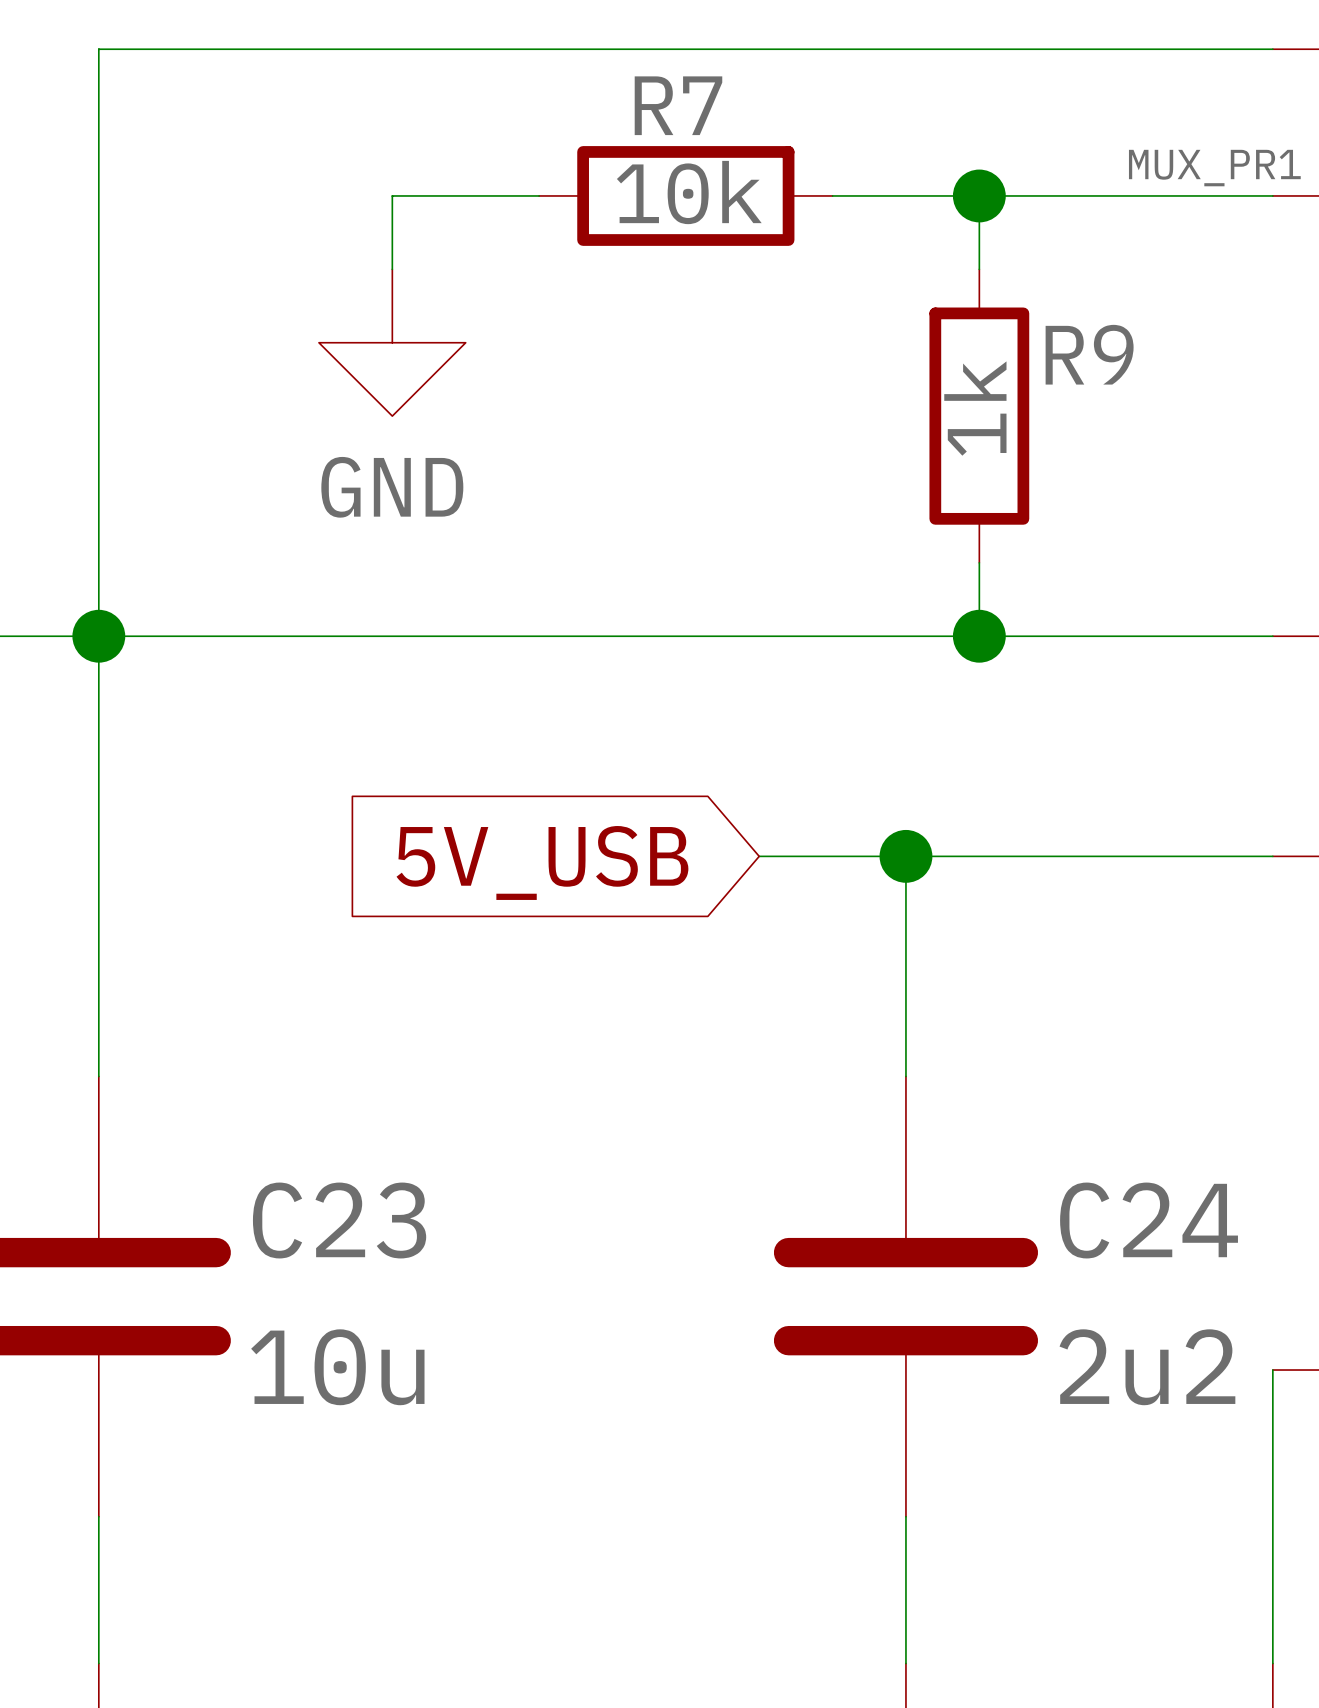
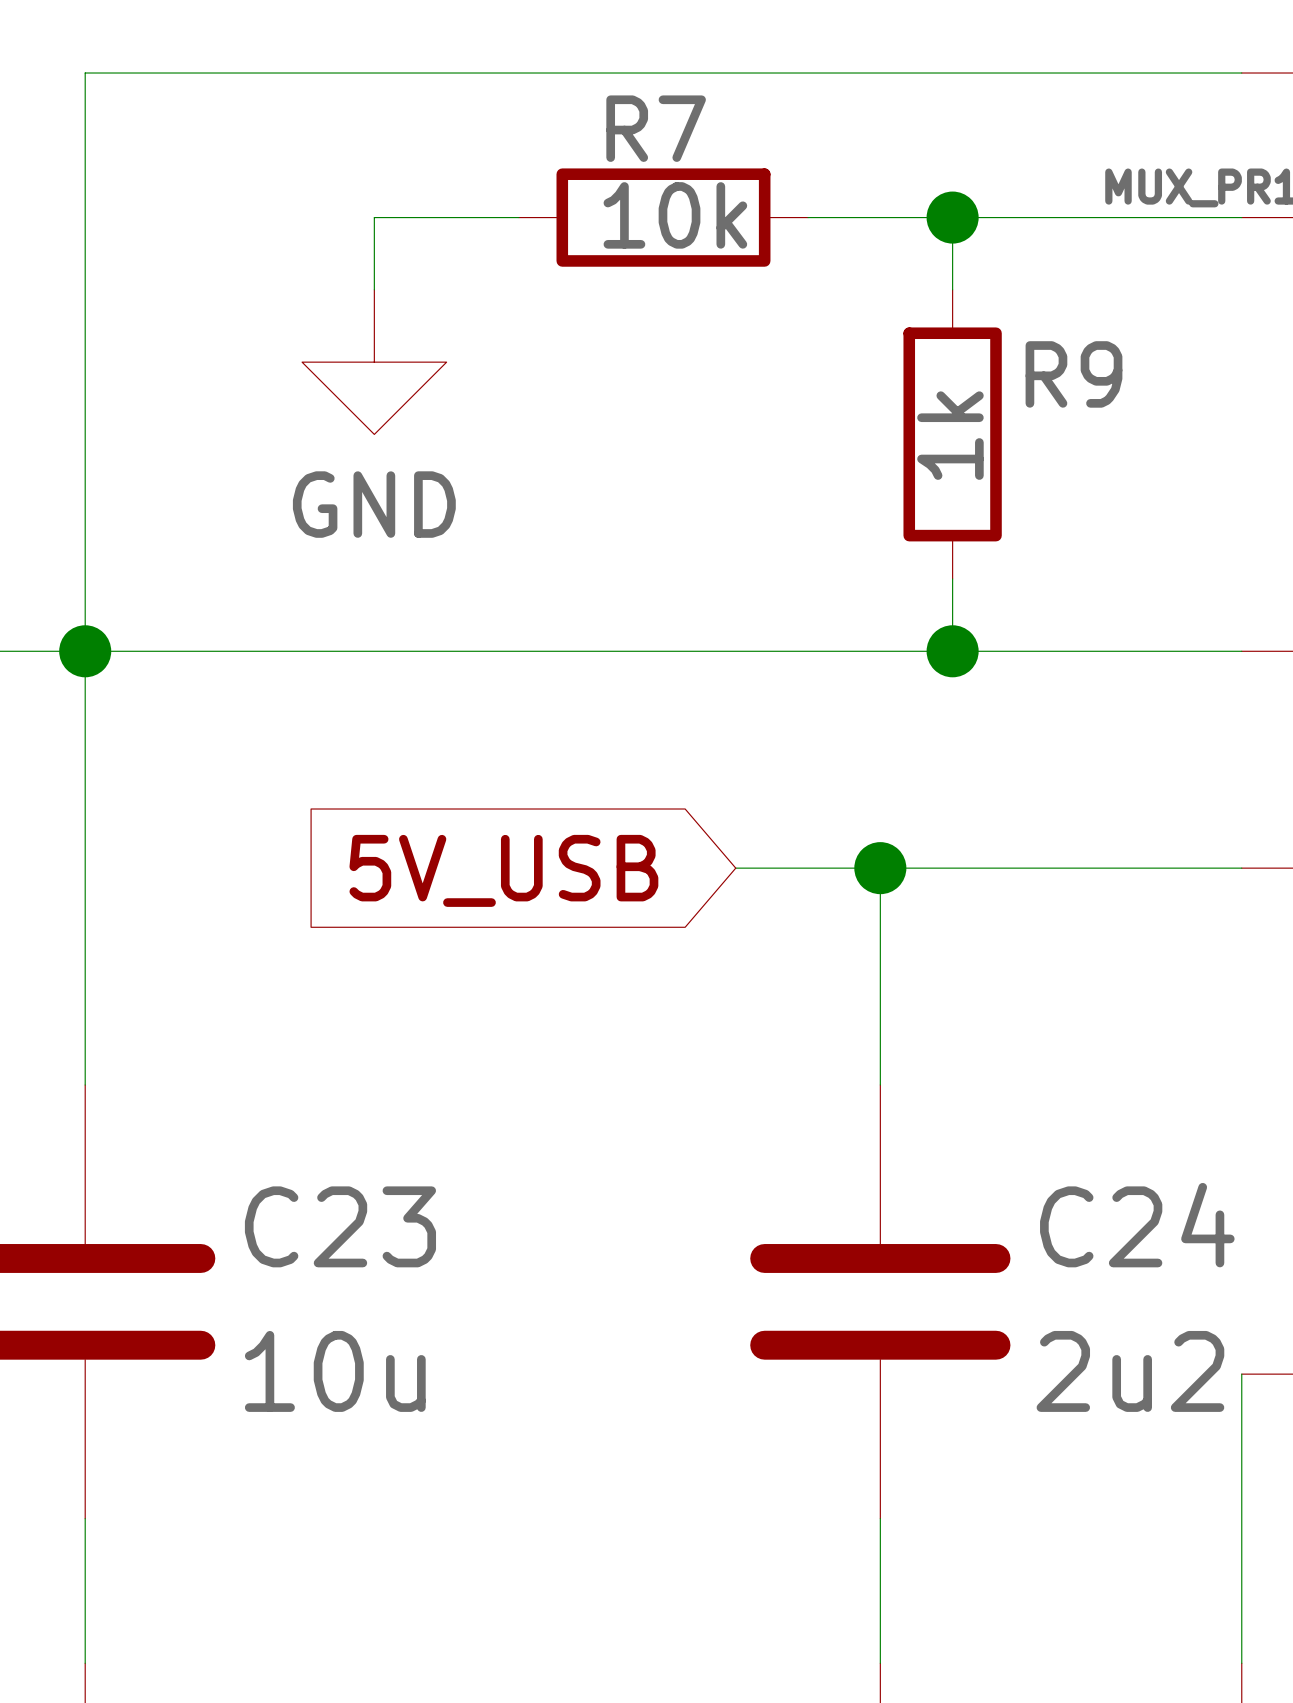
R7 name position: R7 (678, 105) -> R7 (656, 128)
R9 value position: 1k (975, 408) -> 1k (950, 435)

